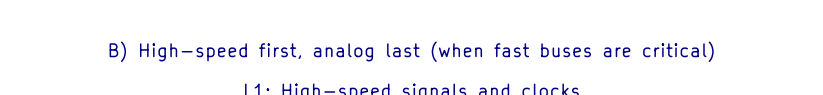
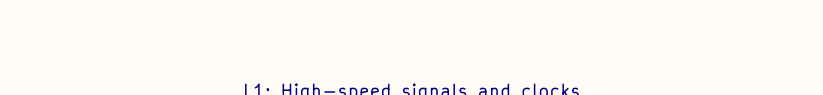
text: B) High-speed first, analog last (when fast buses are critical) (411, 51) -> none

